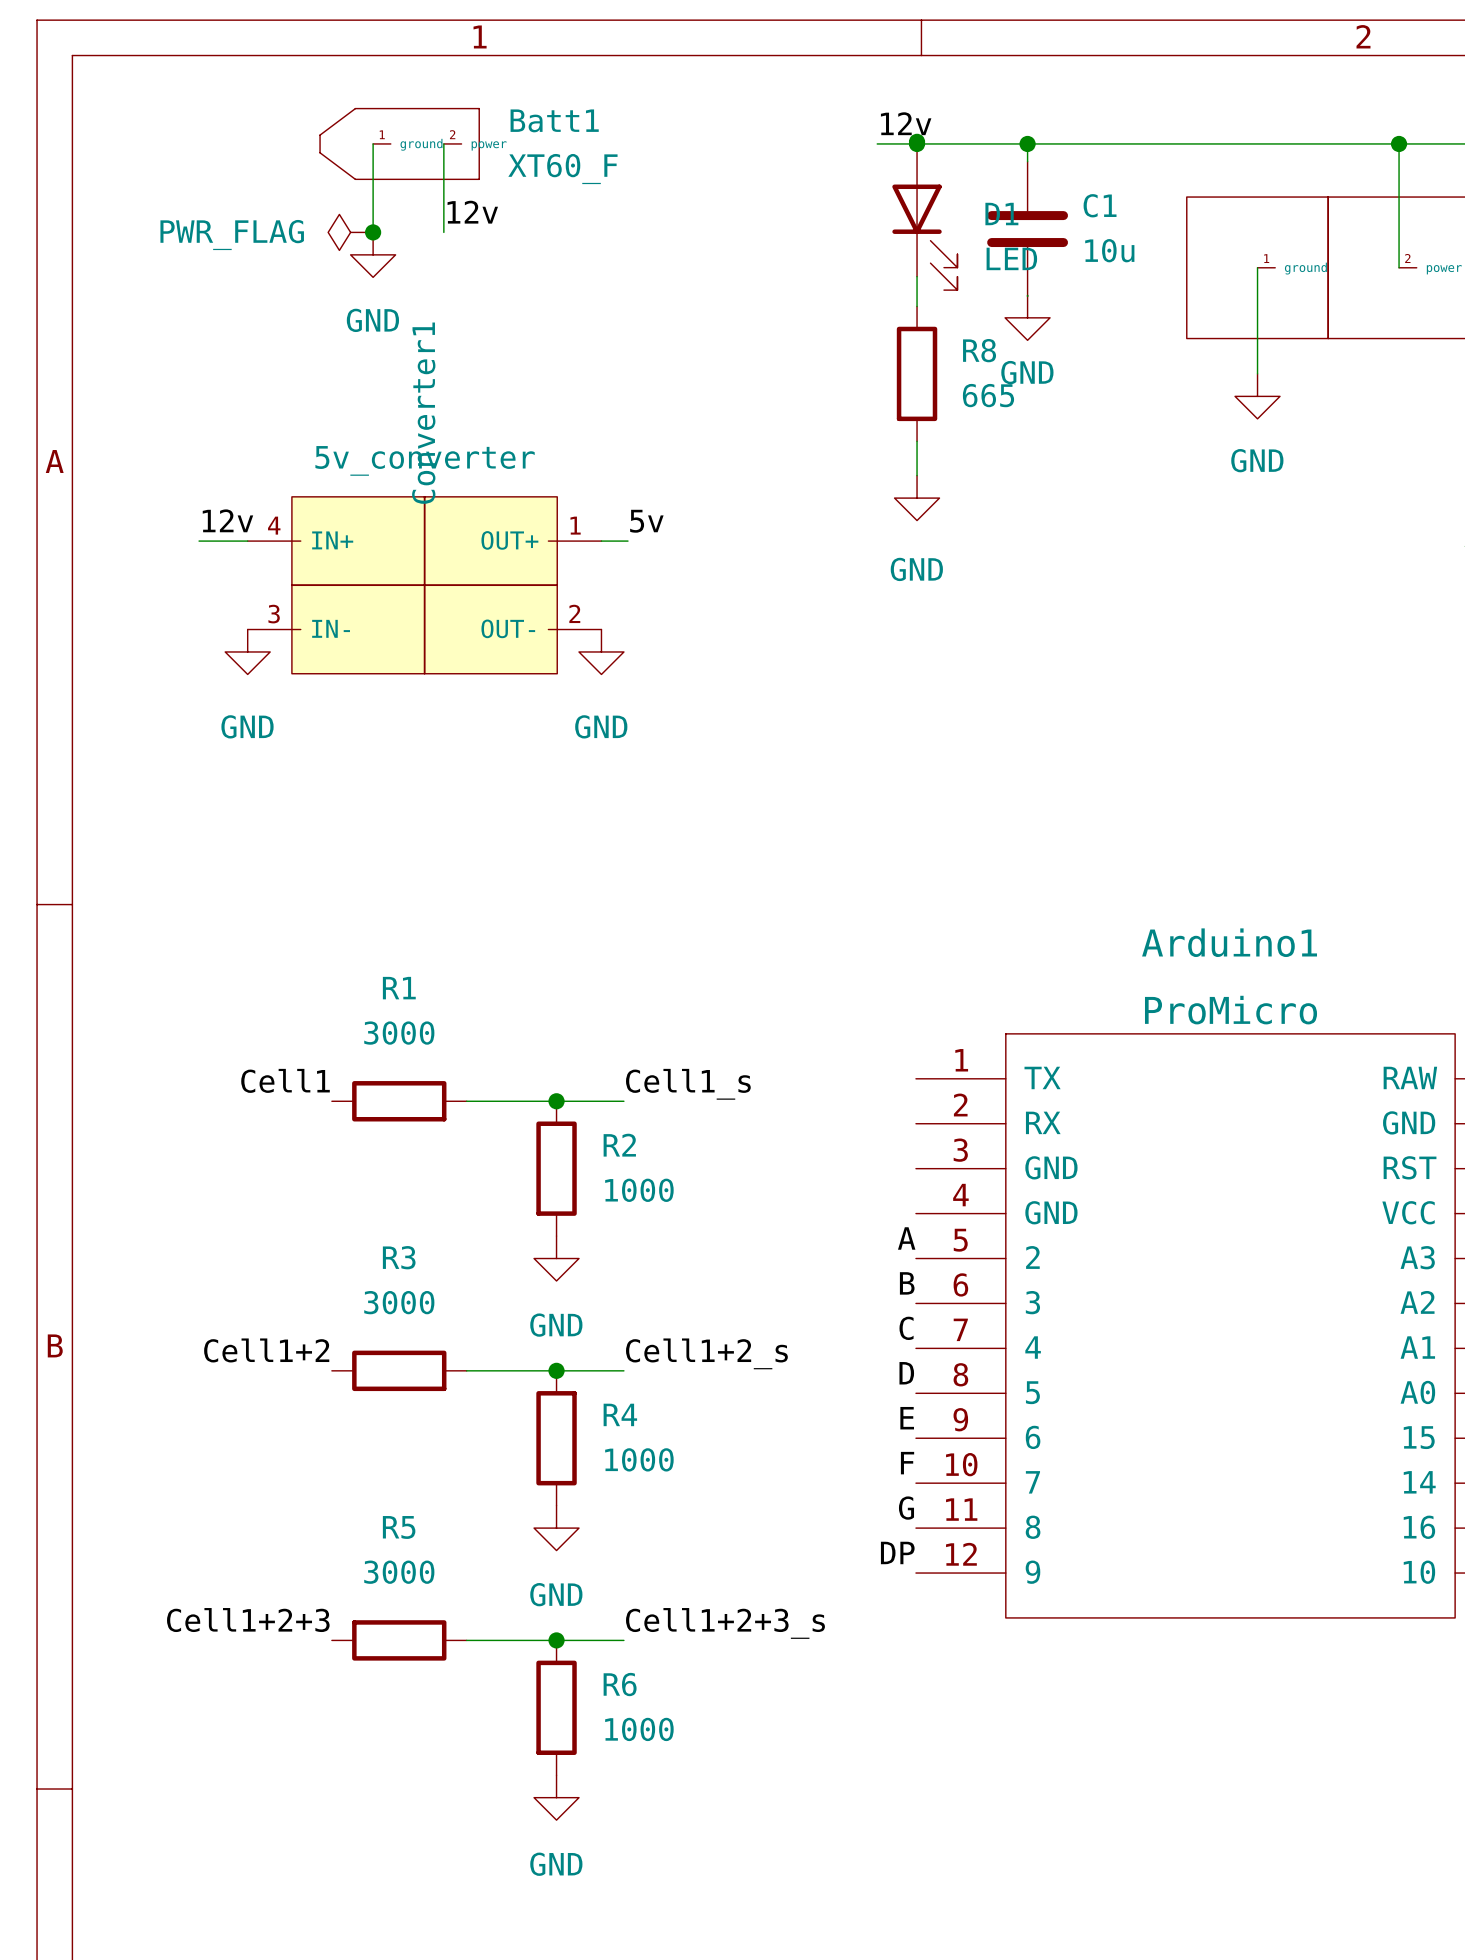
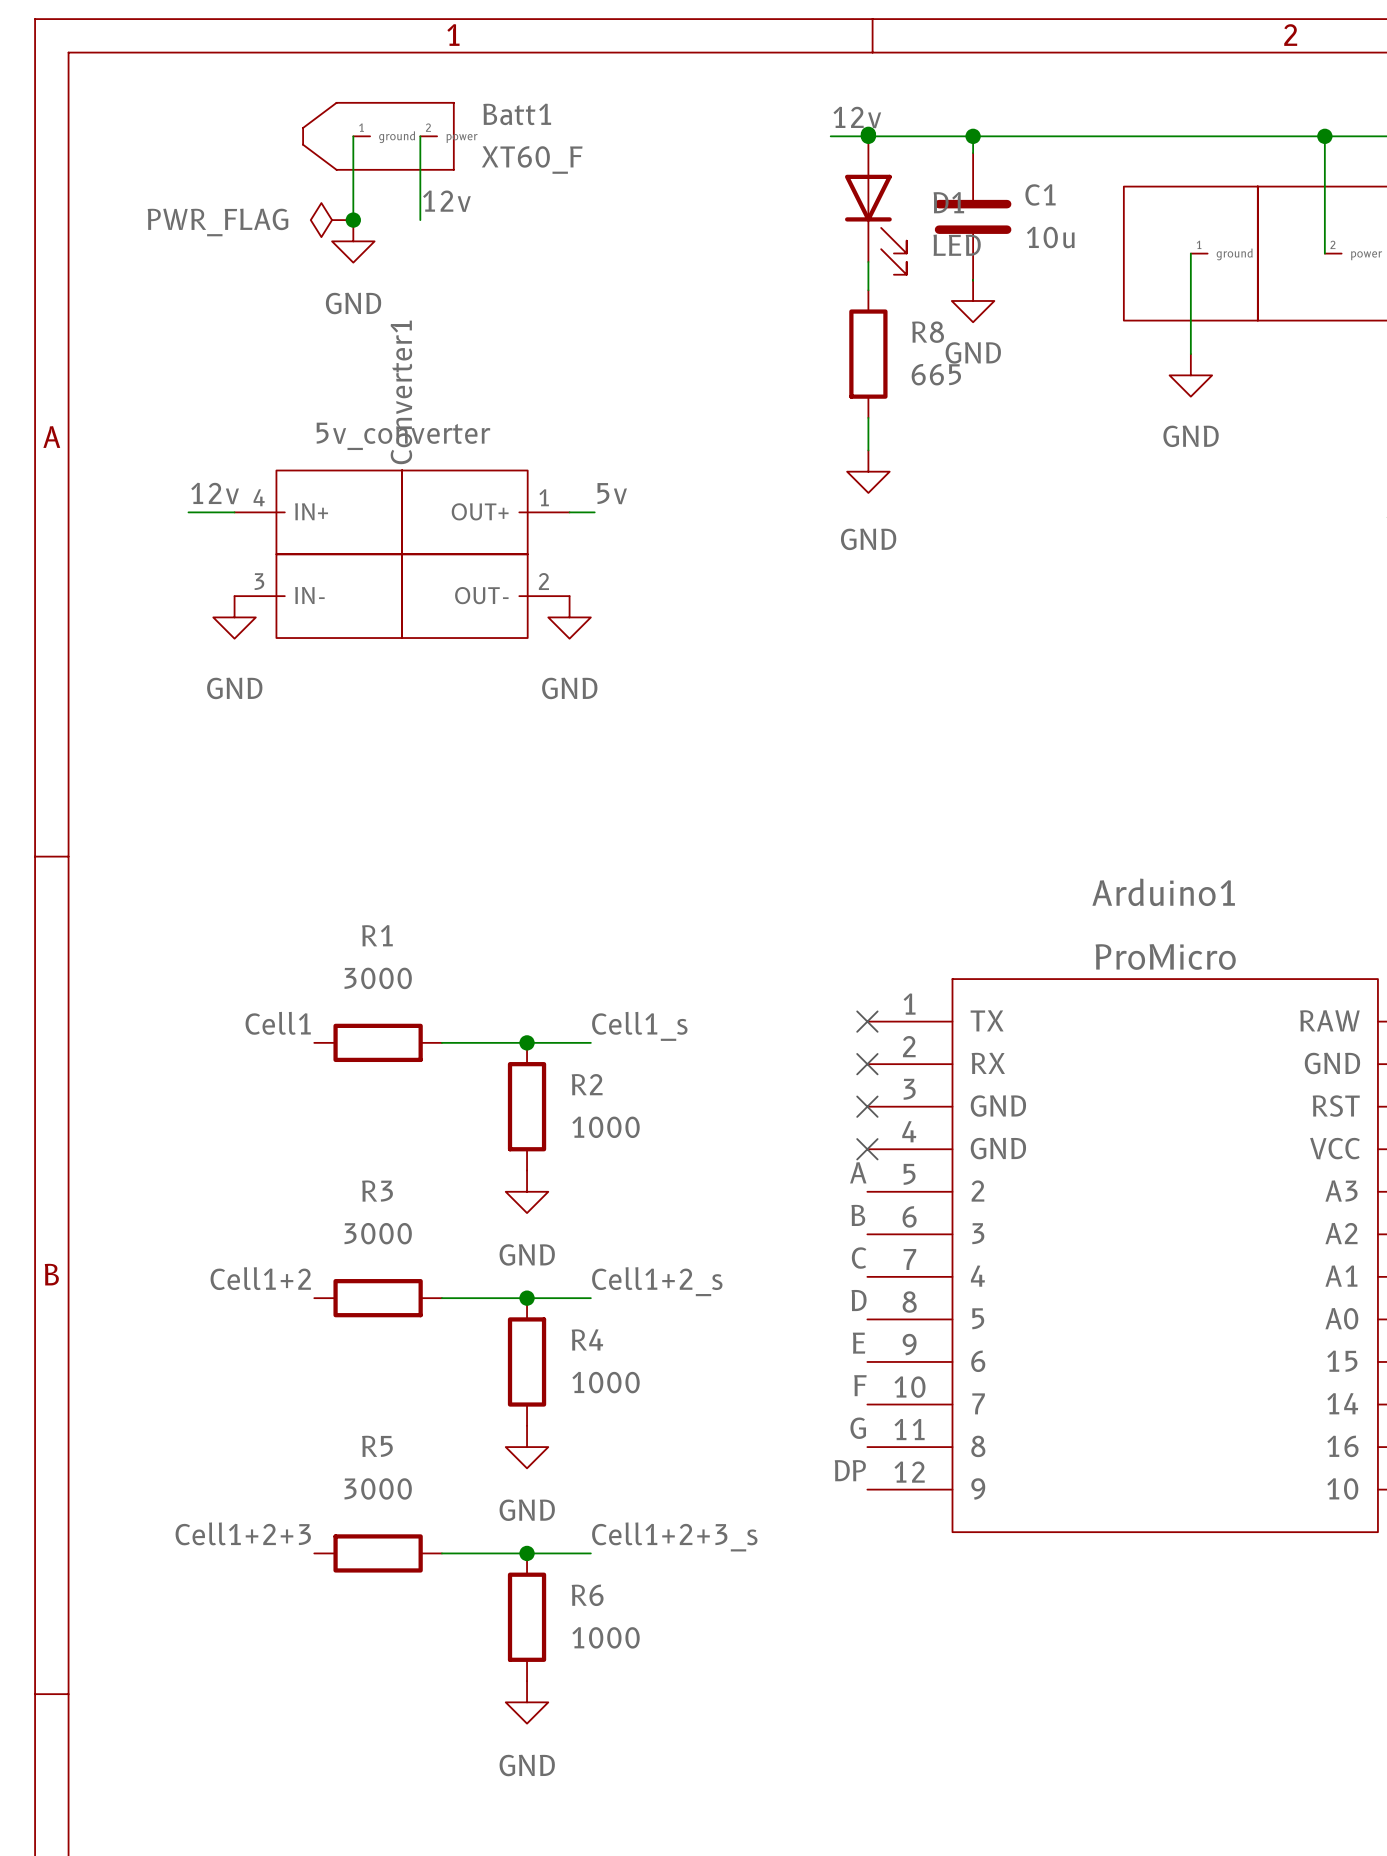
no-connect mark: none -> (867, 1021)
no-connect mark: none -> (867, 1064)
no-connect mark: none -> (867, 1106)
no-connect mark: none -> (867, 1149)

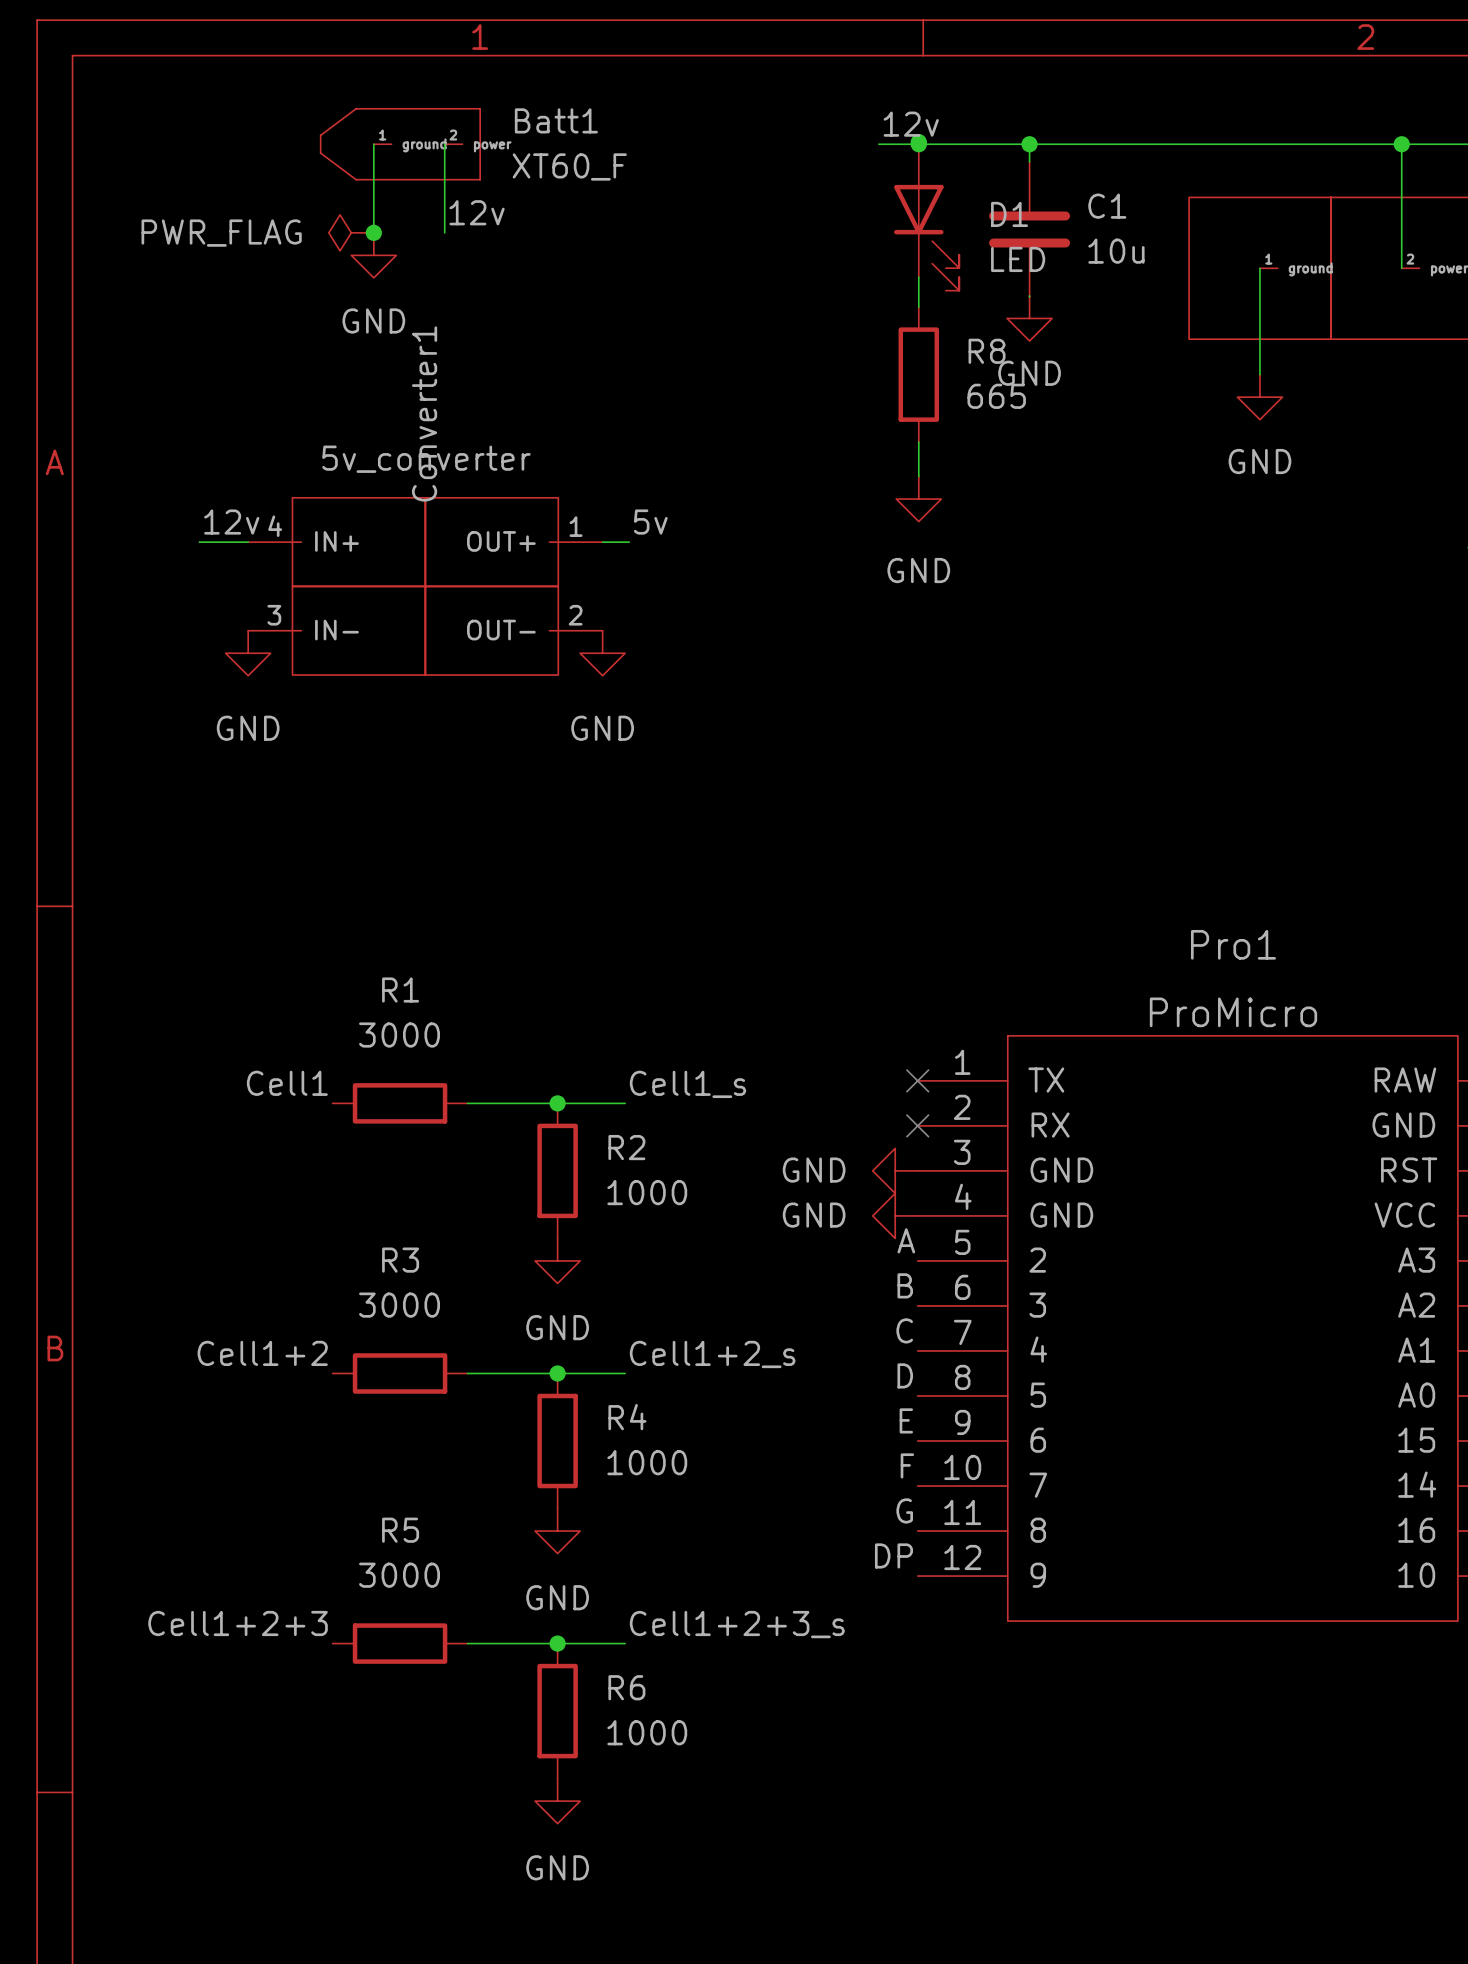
Arduino1 name: Arduino1 (1163, 892) -> Pro1 (1233, 944)
power symbol: none -> GND (895, 1170)
no-connect mark: (867, 1106) -> none
power symbol: none -> GND (895, 1215)
no-connect mark: (867, 1149) -> none

